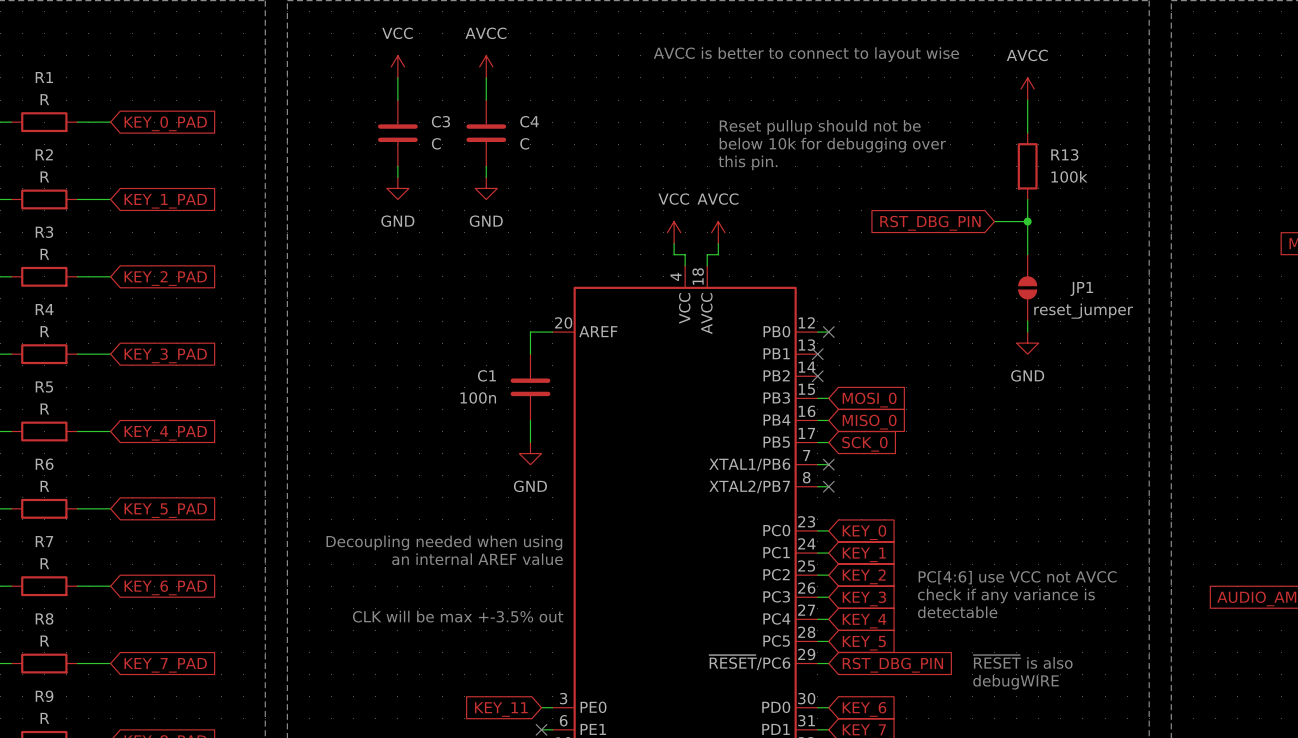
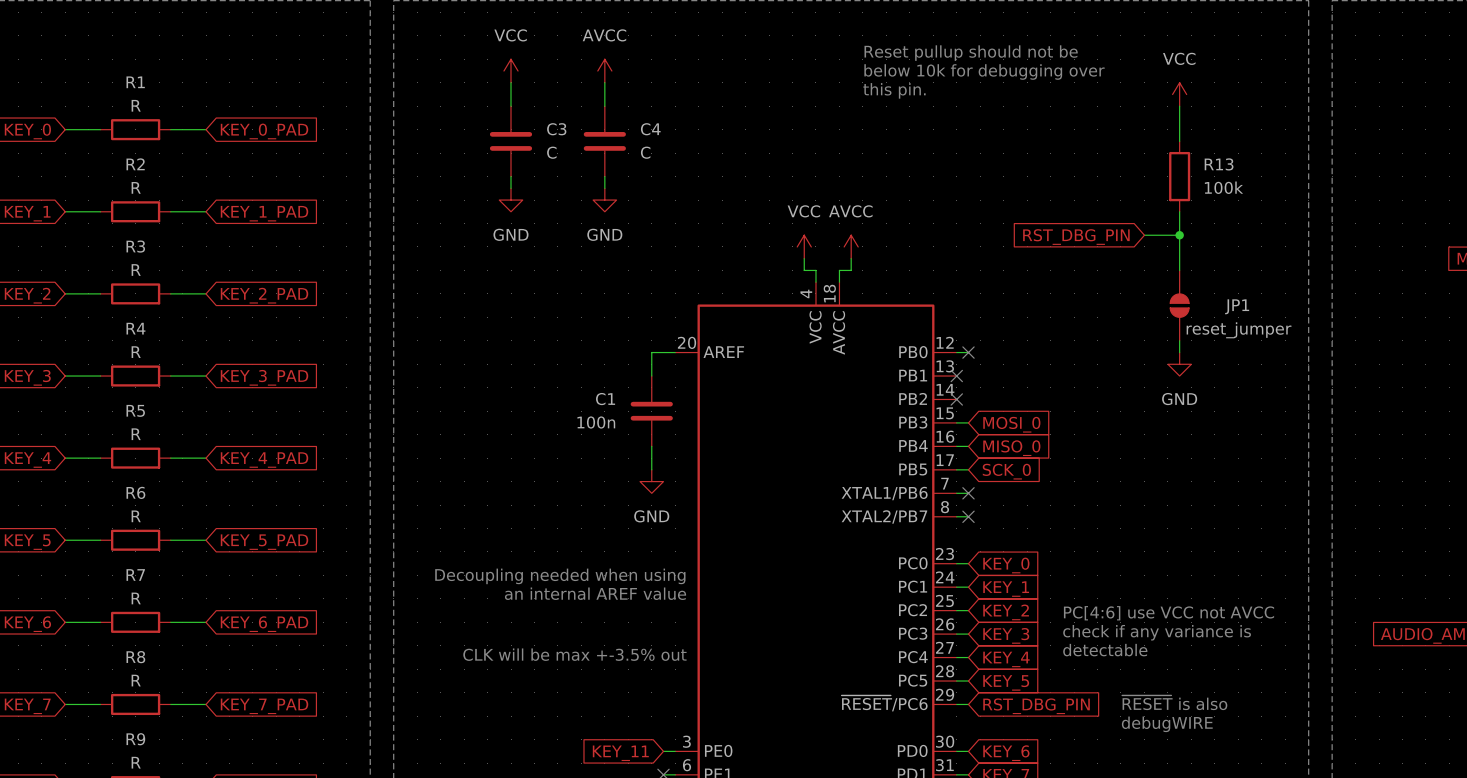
text: AVCC is better to connect to layout wise (806, 54) -> none
power symbol: AVCC (1027, 88) -> VCC (1179, 94)
text position: Reset pullup should not be (820, 127) -> Reset pullup should not be (971, 53)
text position: below 10k for debugging over (832, 145) -> below 10k for debugging over (984, 71)
text position: this pin. (748, 162) -> this pin. (894, 90)

